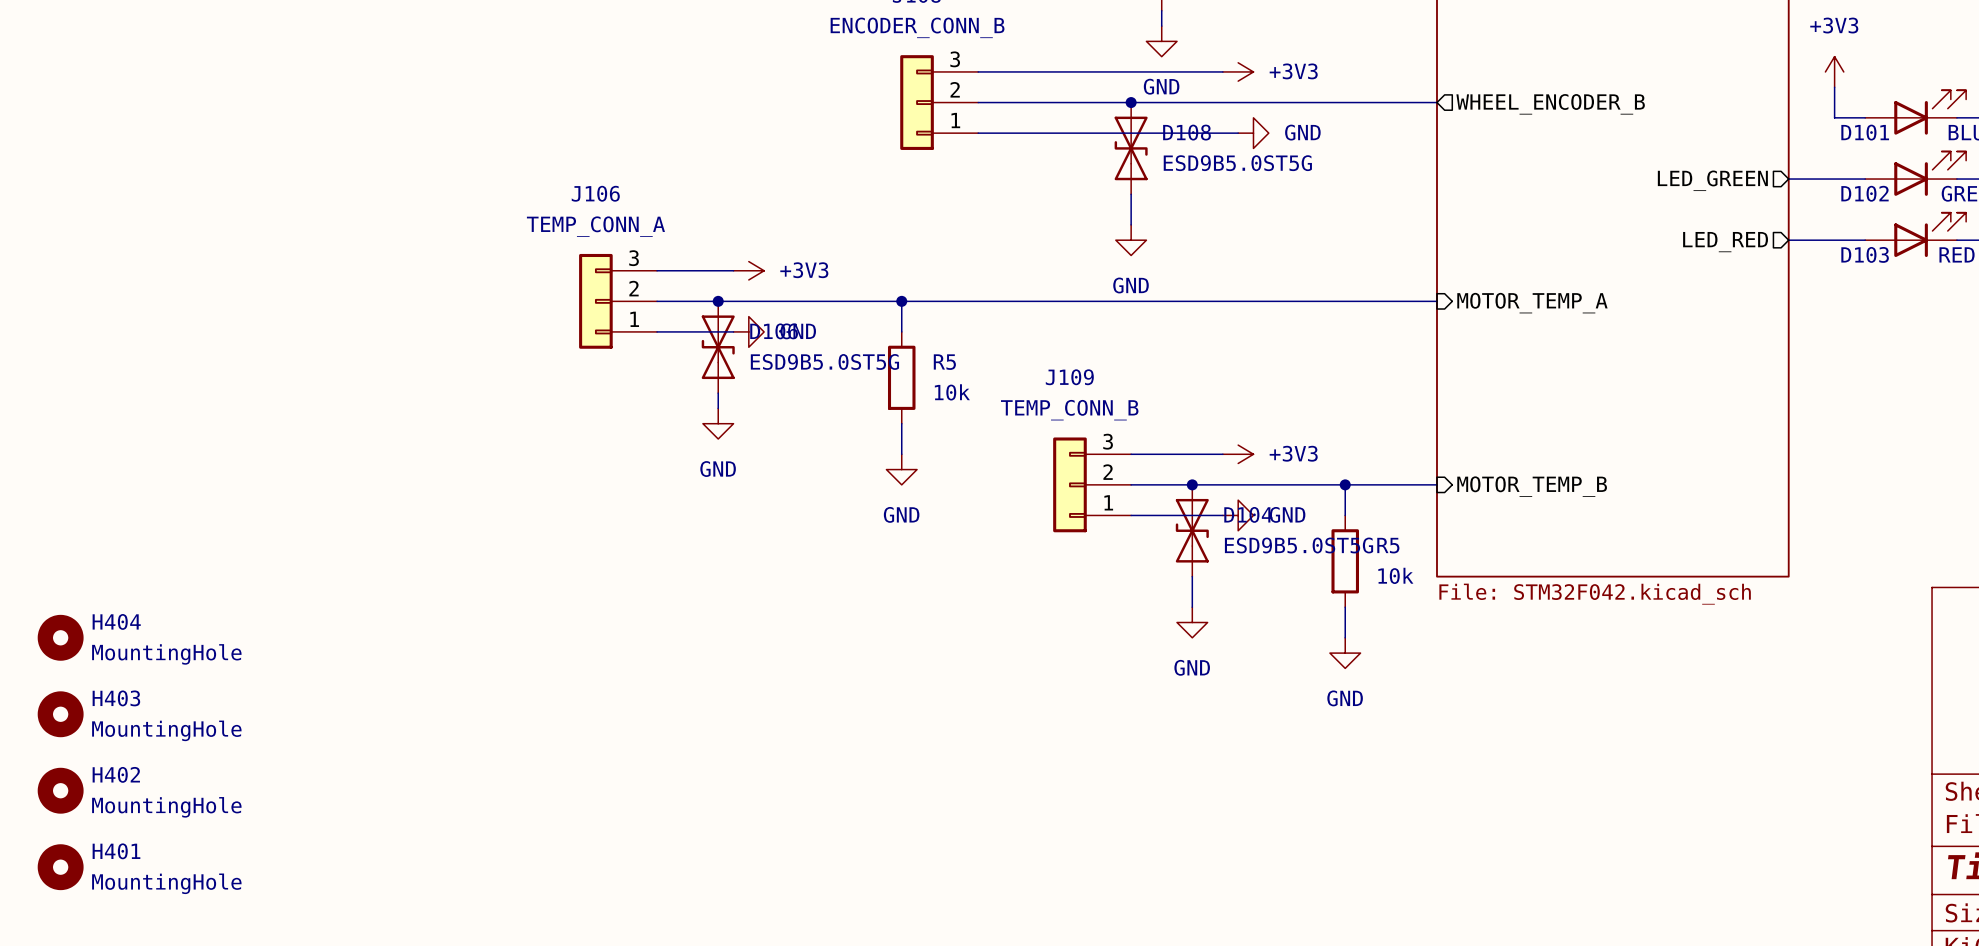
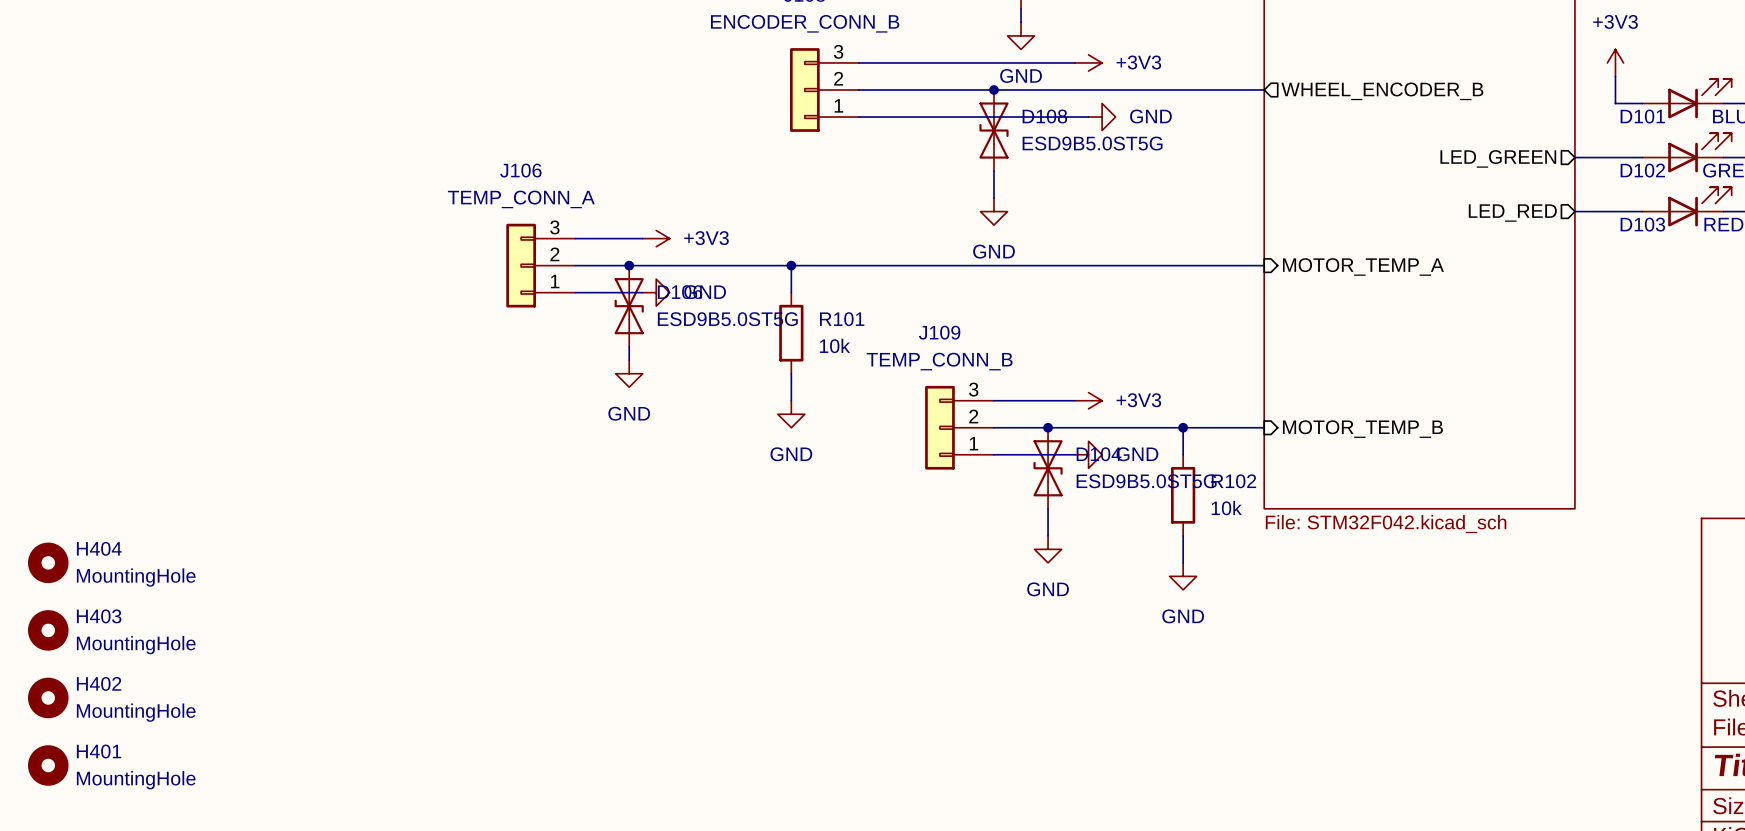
R5 name: R5 (944, 362) -> R101 (842, 319)
R5 name: R5 (1388, 545) -> R102 (1233, 481)

